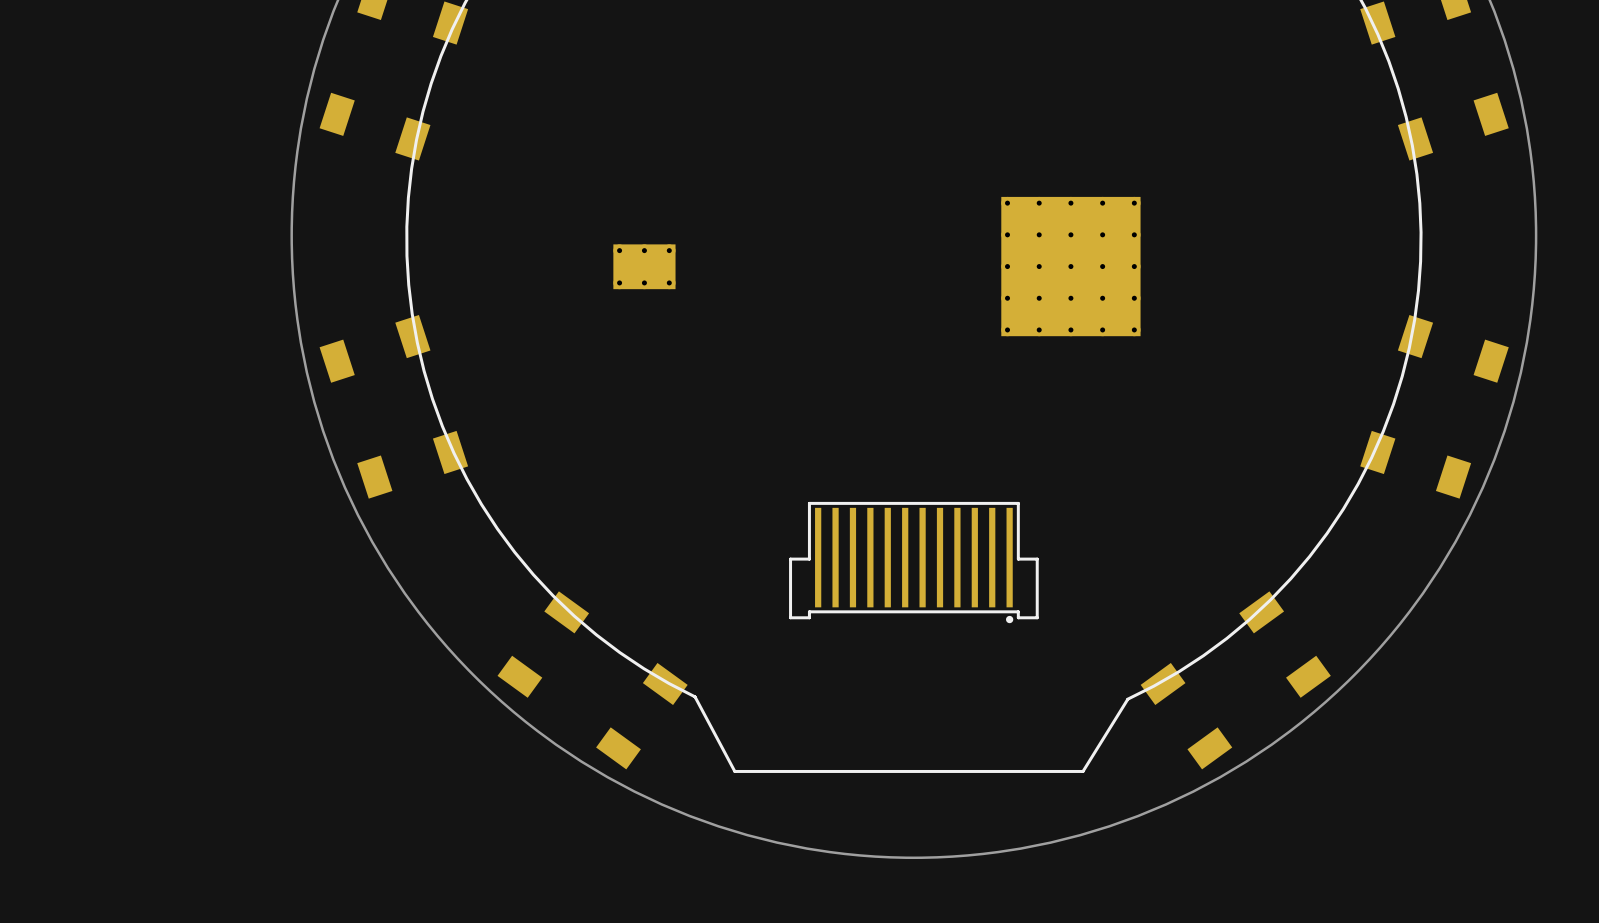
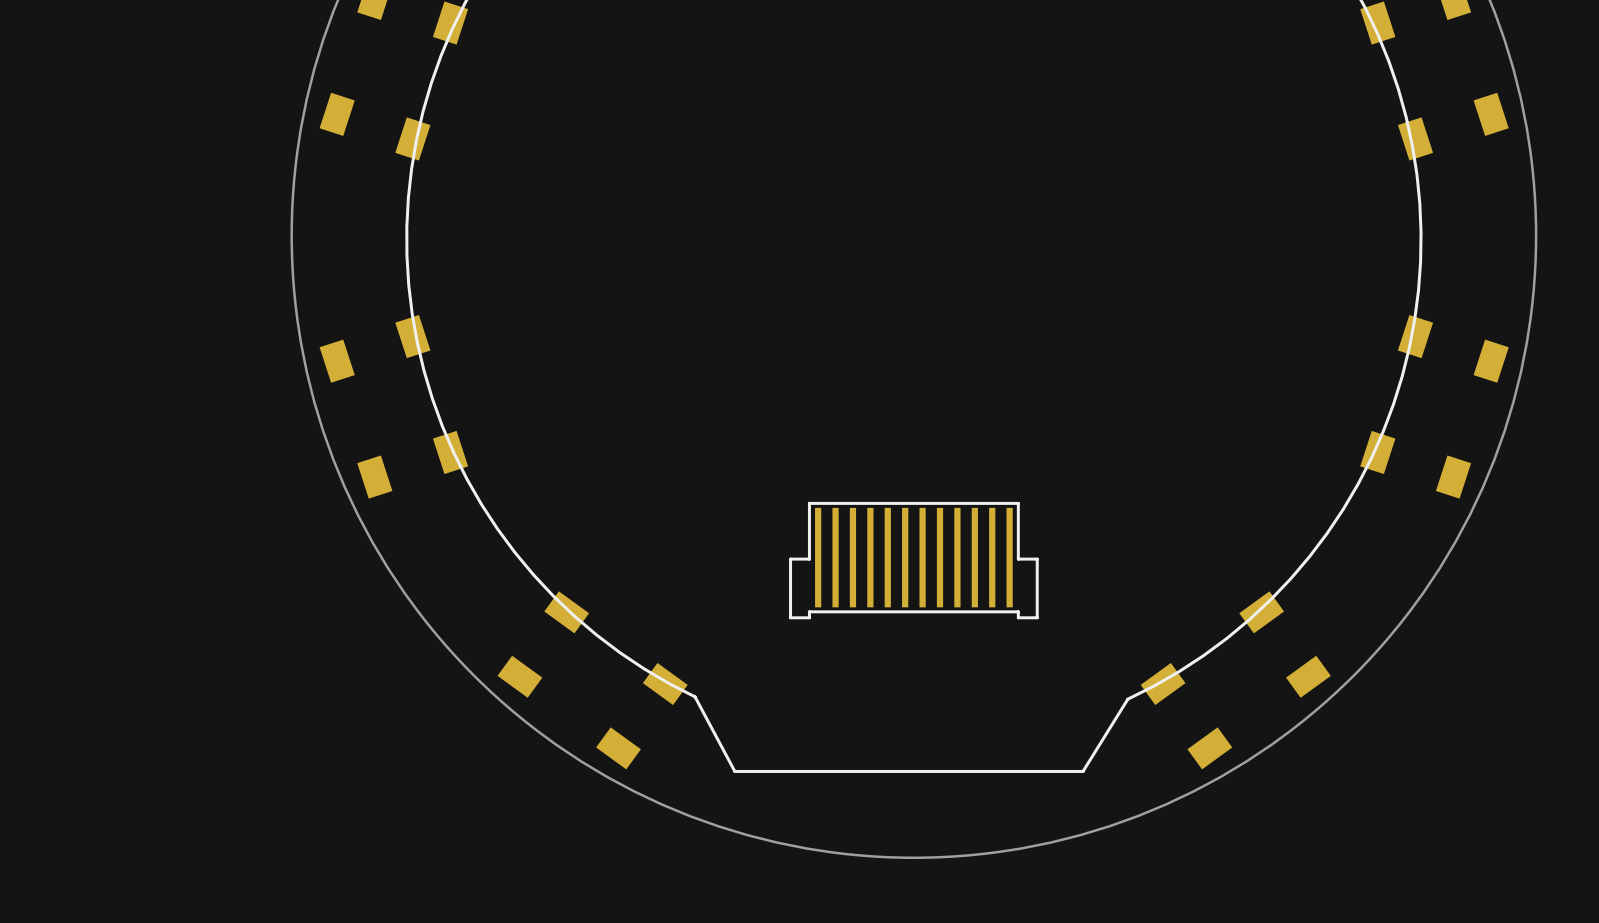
part: (644, 266) -> none
part: (1070, 266) -> none
drawing: [1006, 615, 1014, 624] -> none

